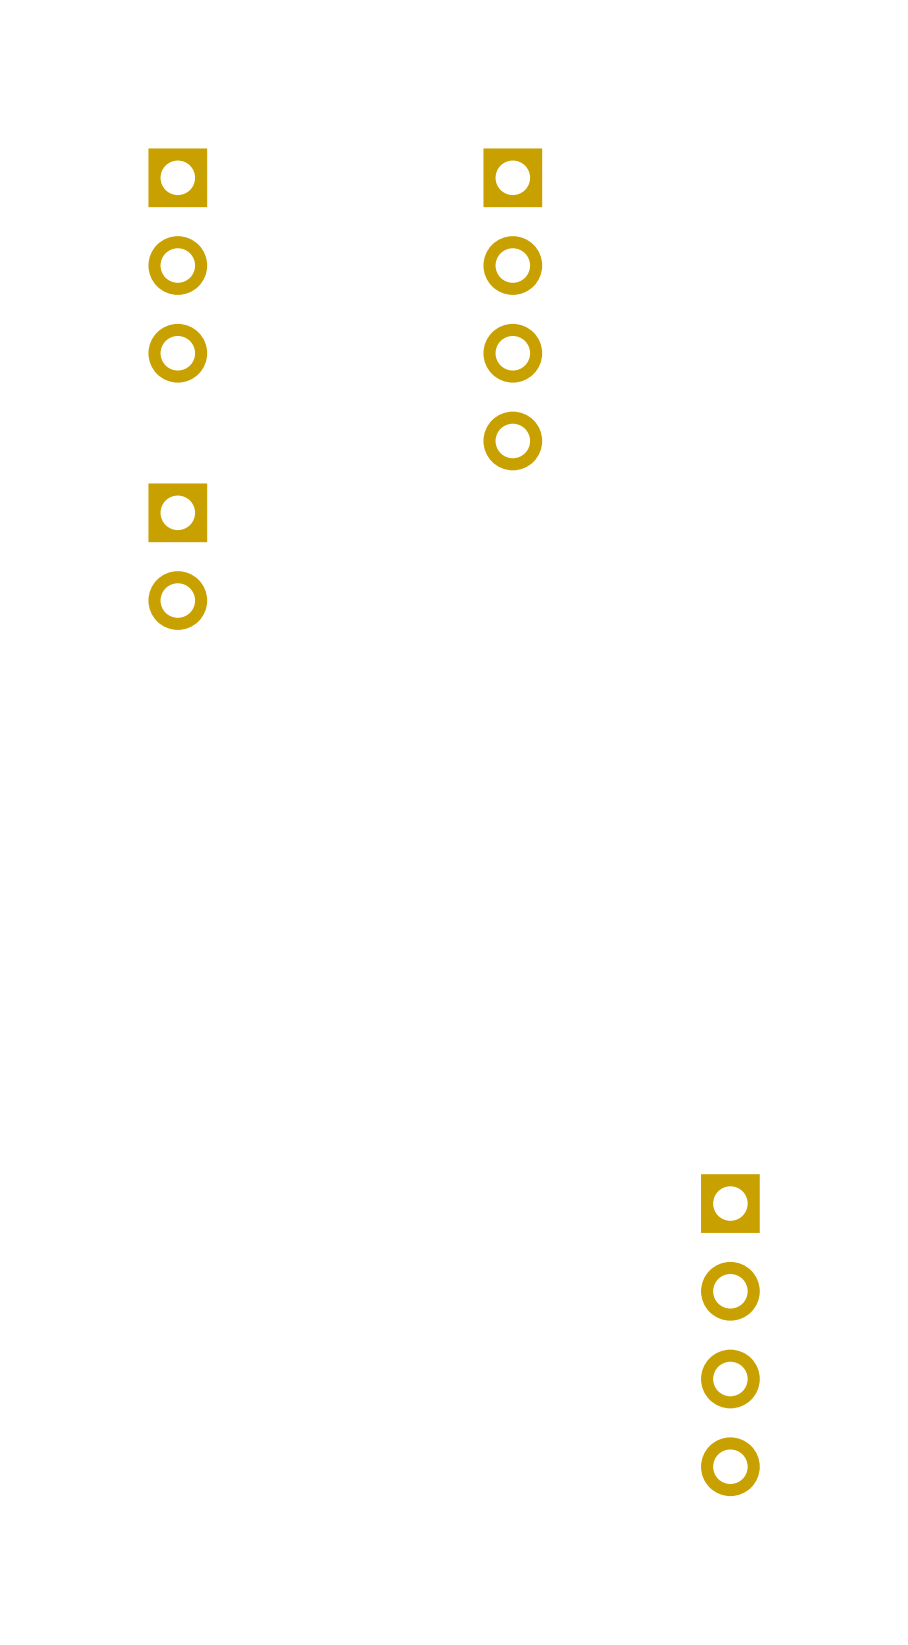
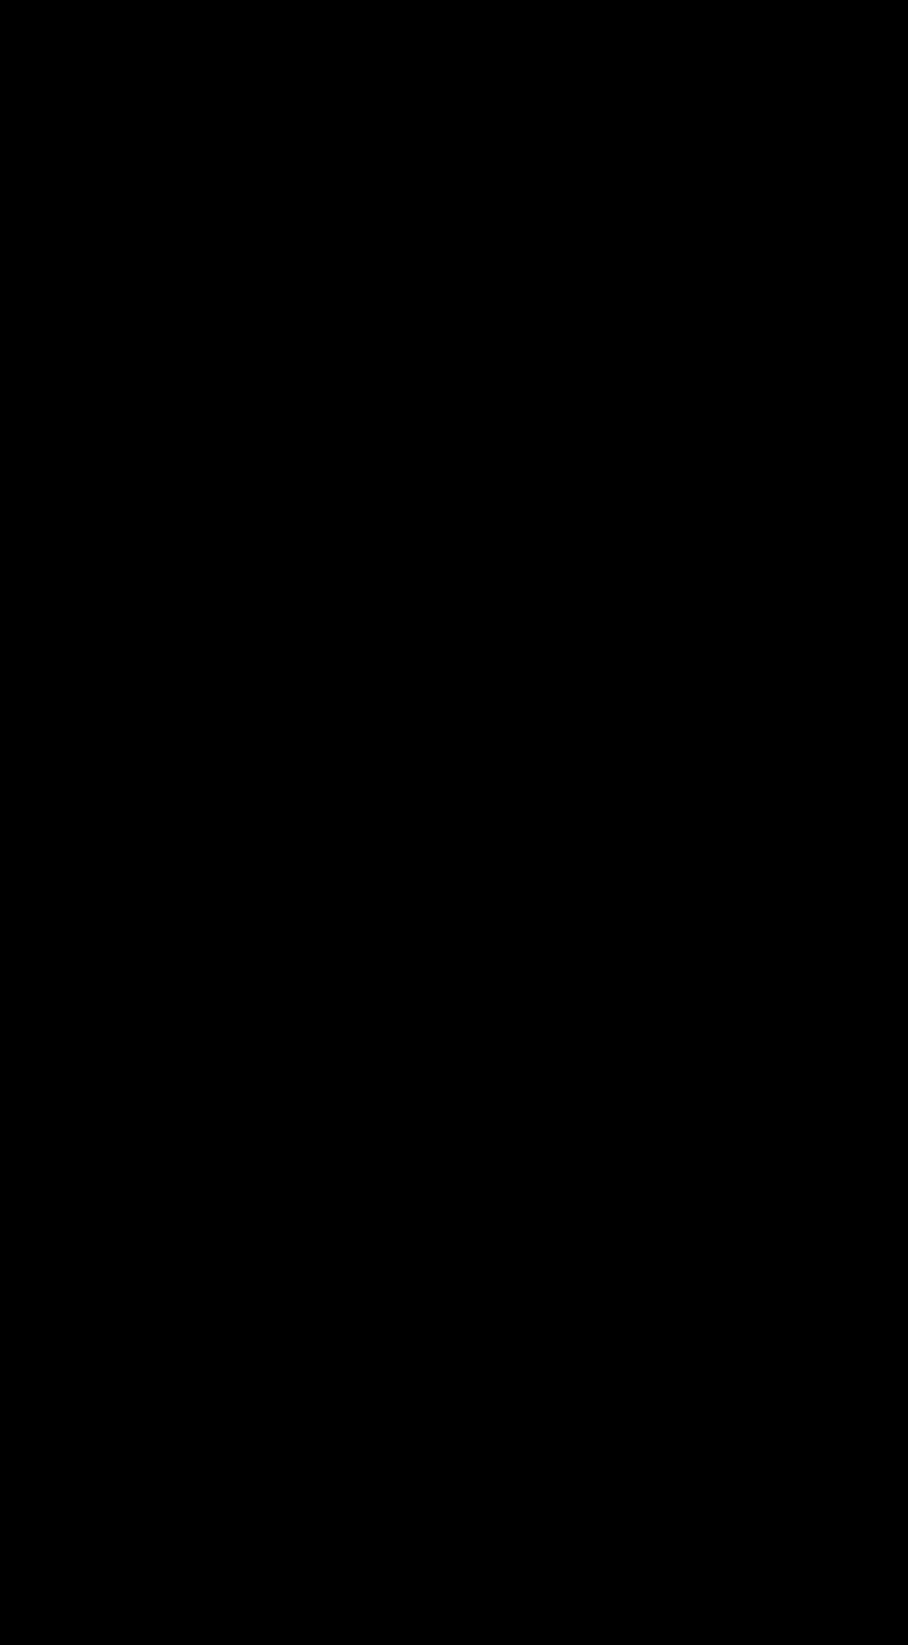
part: (177, 265) -> none
part: (512, 309) -> none
part: (177, 556) -> none
part: (730, 1335) -> none

